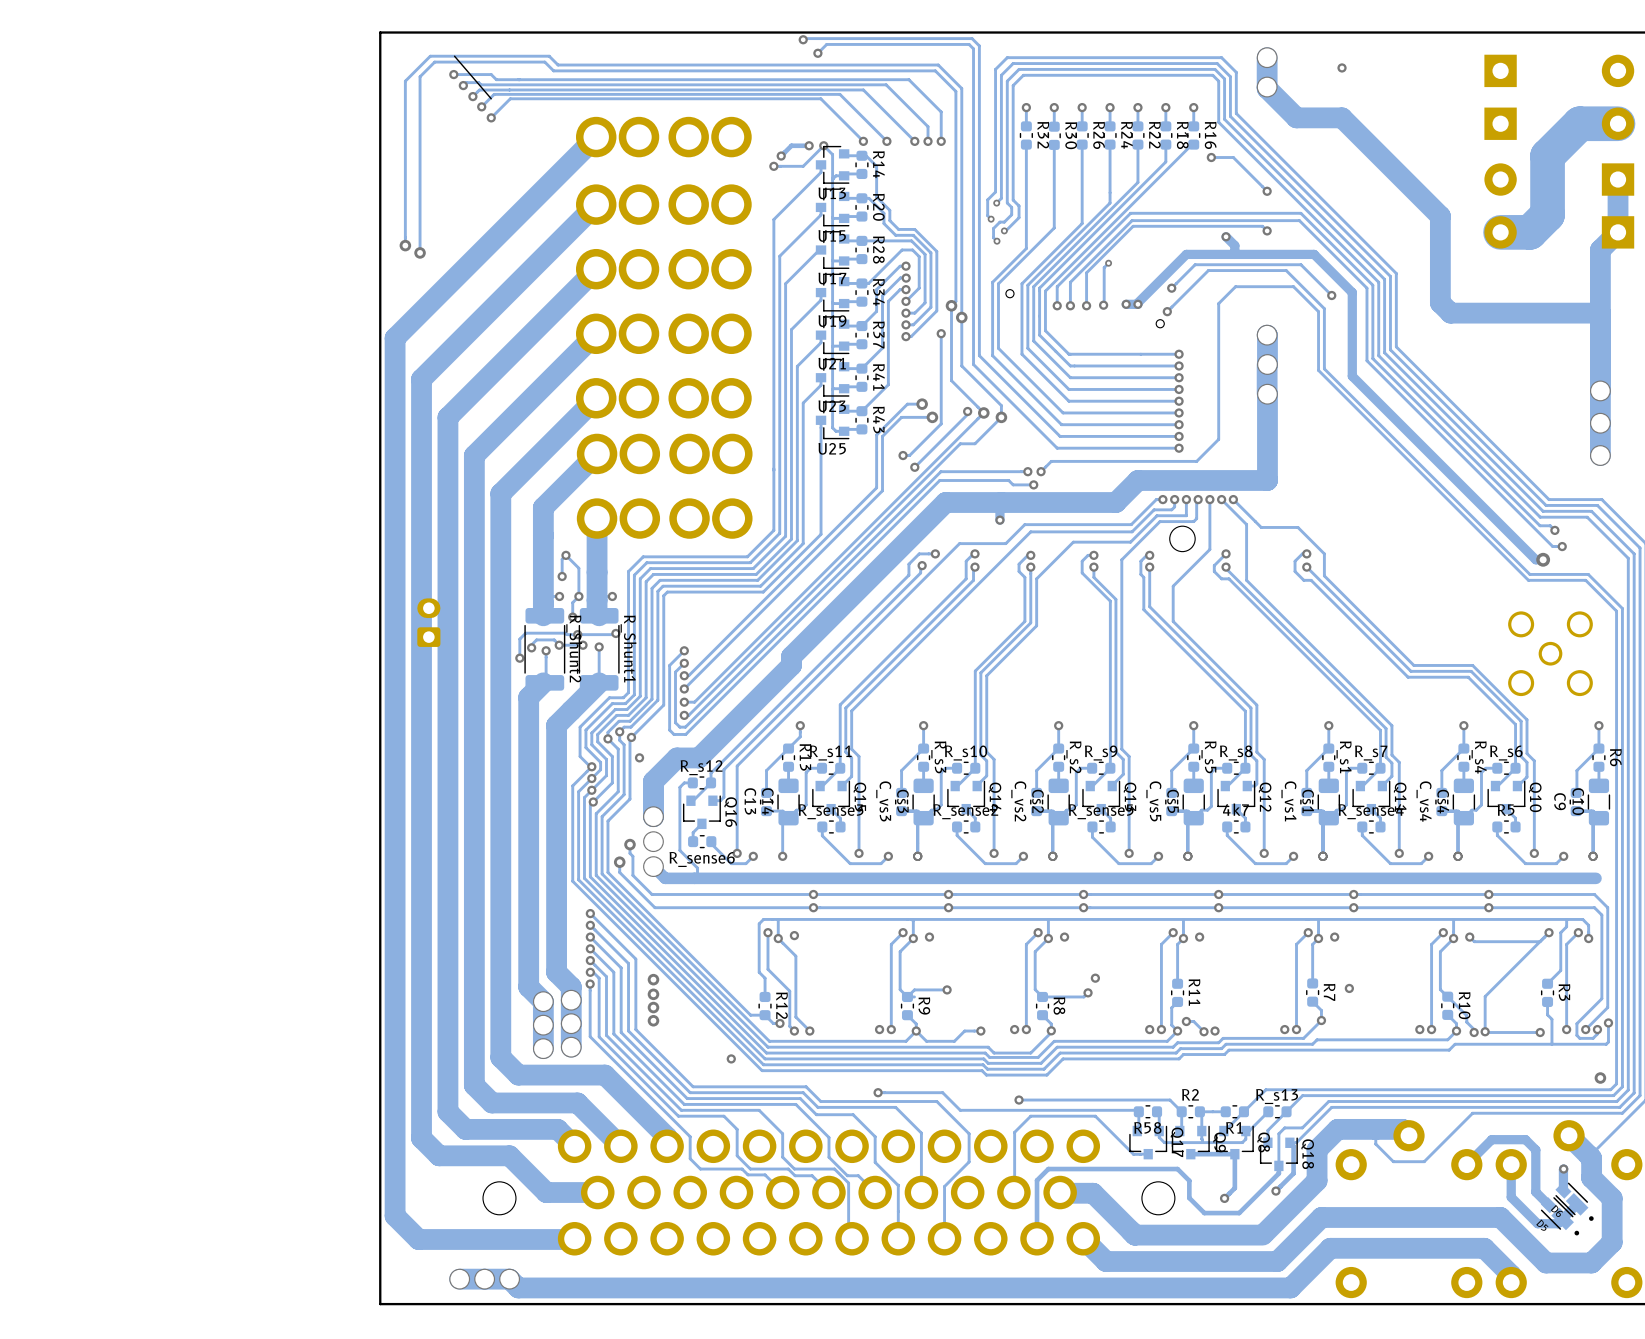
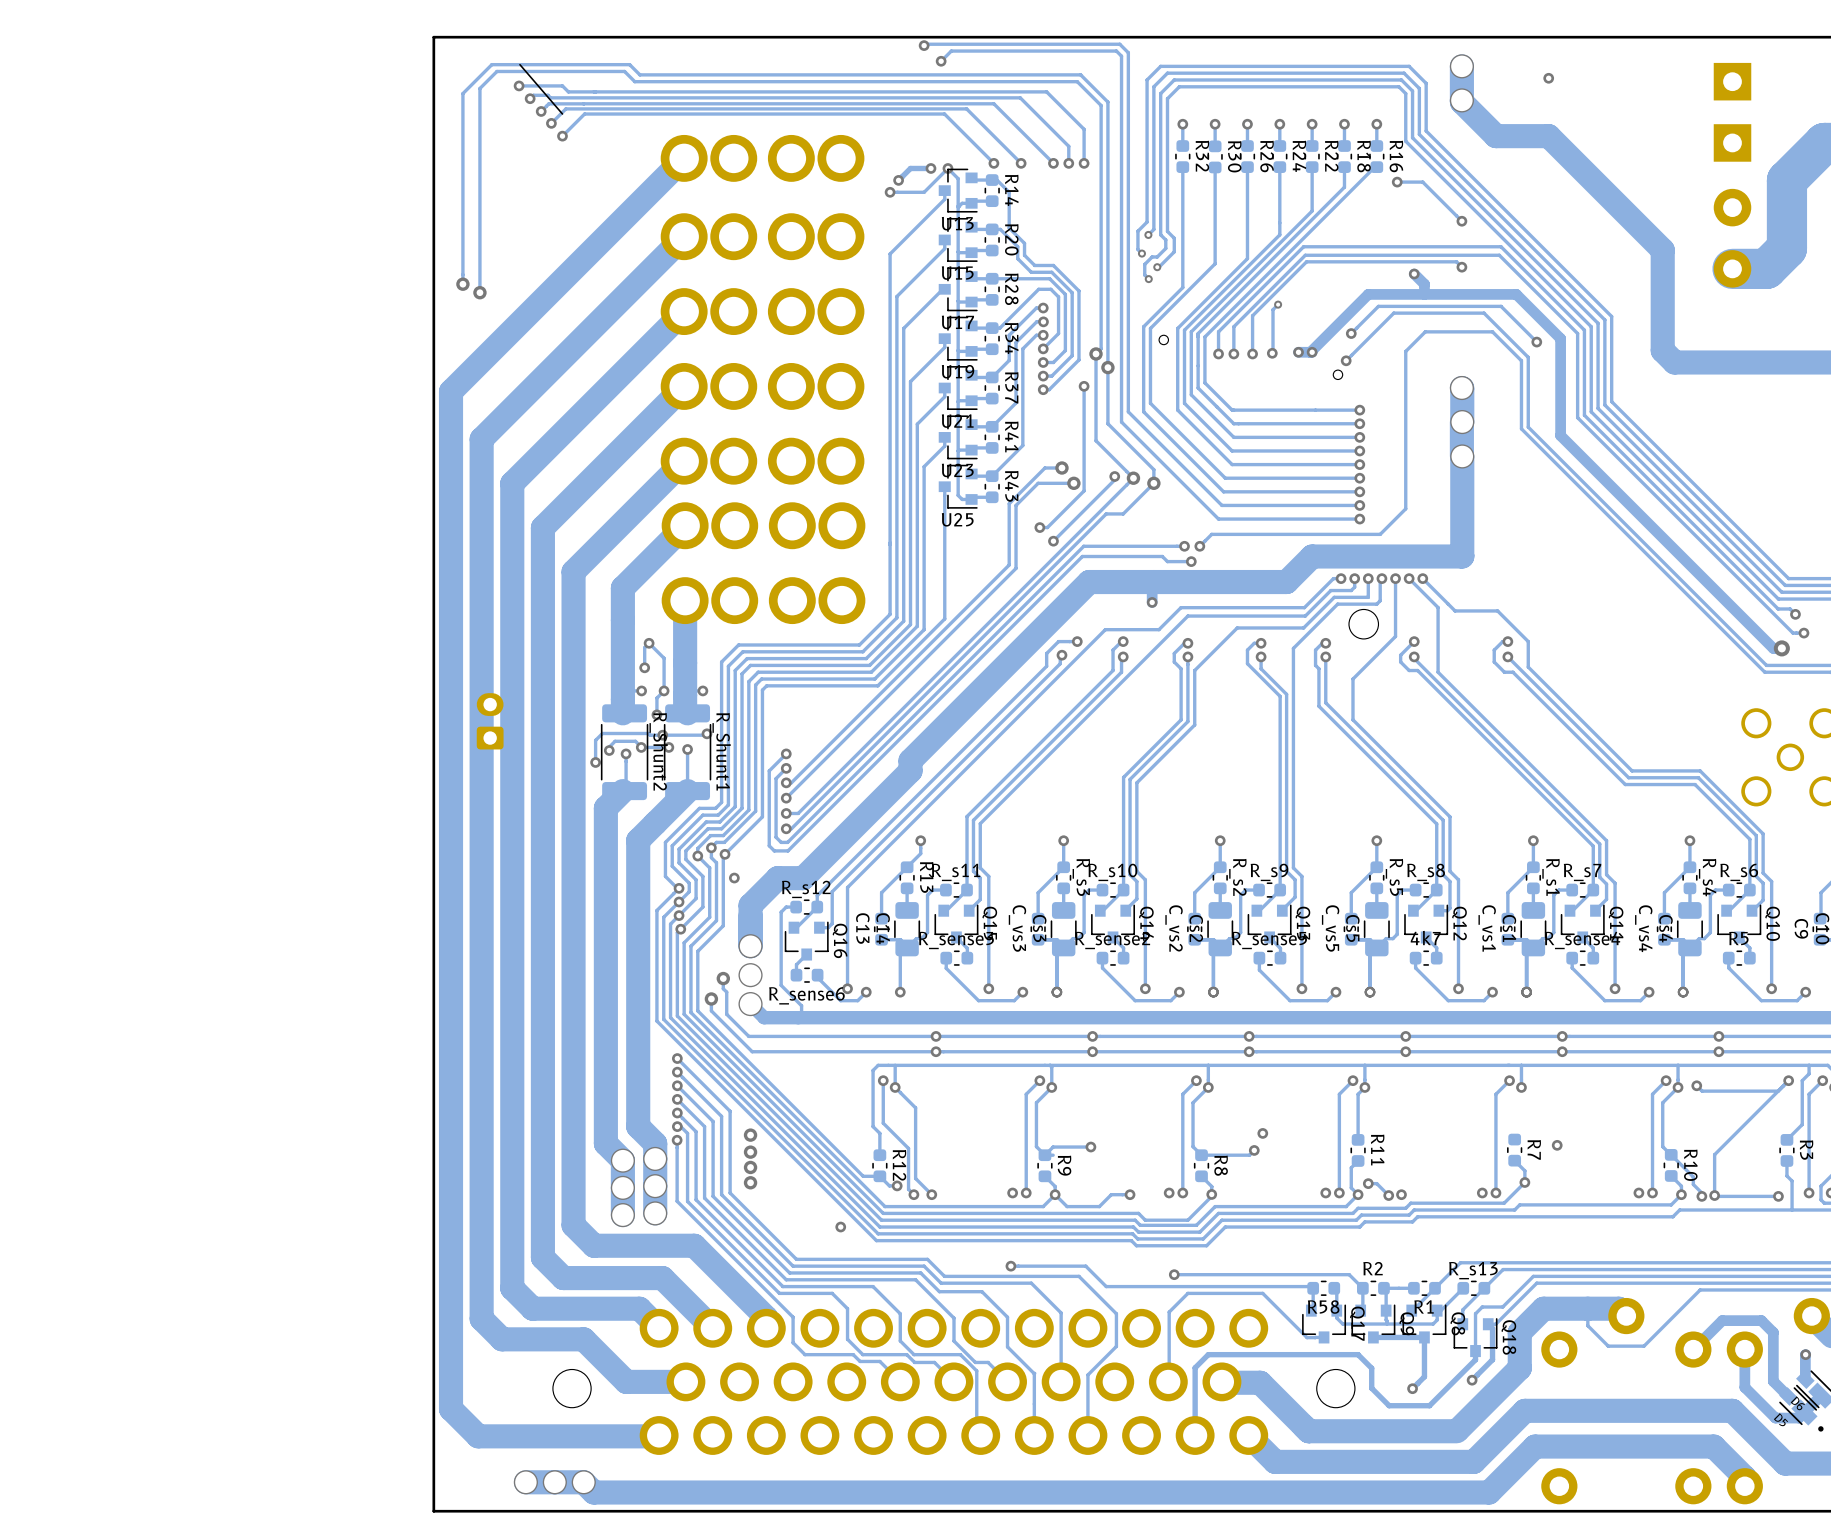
via: (794, 935) -> none
via: (929, 937) -> none
via: (1064, 937) -> none
via: (1199, 937) -> none
via: (1334, 937) -> none
track: (1318, 938) (1312, 944) (1312, 983) -> none

